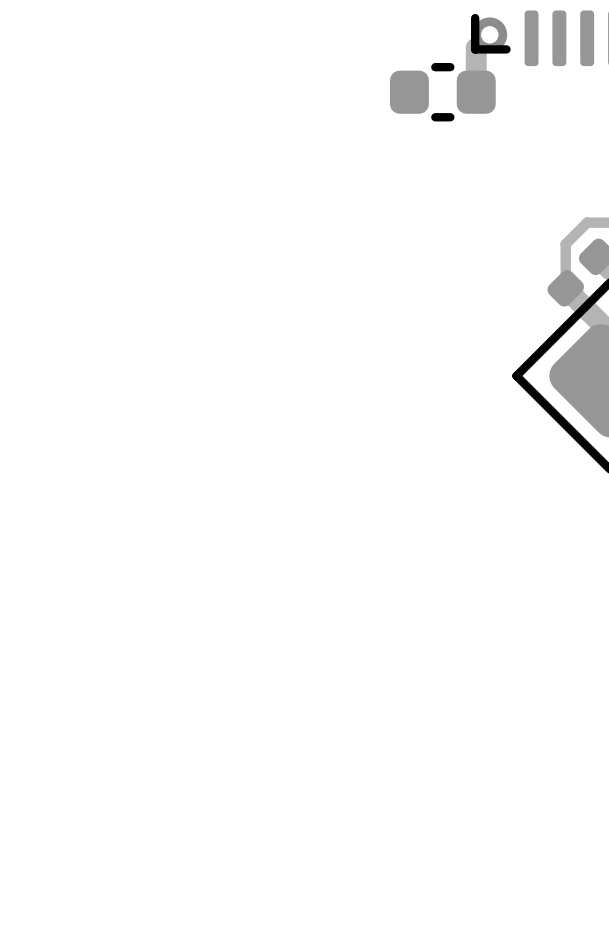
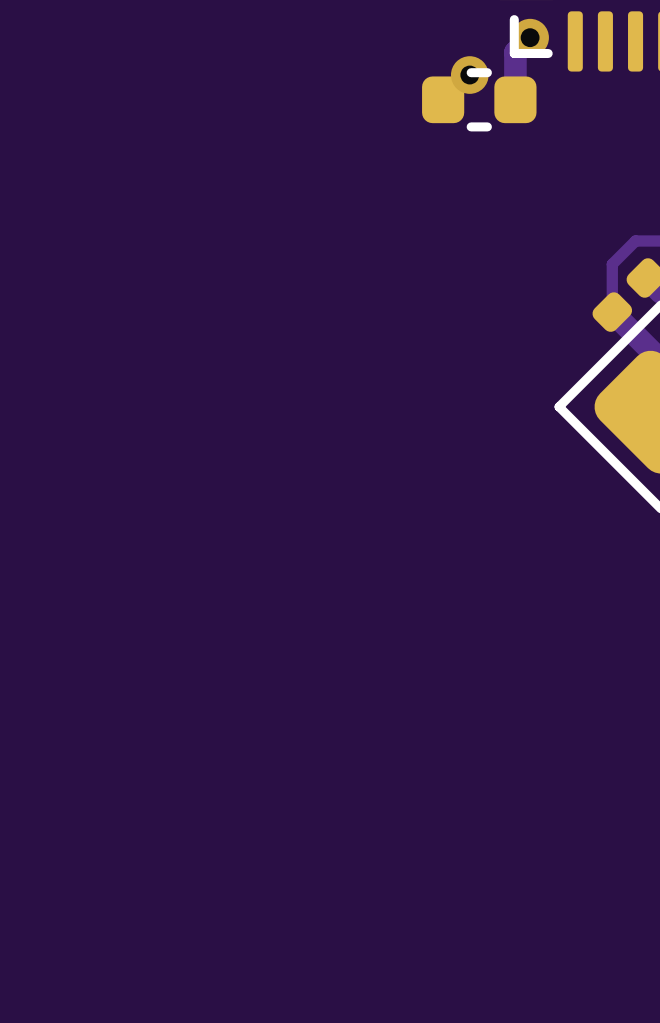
via: none -> (469, 75)

